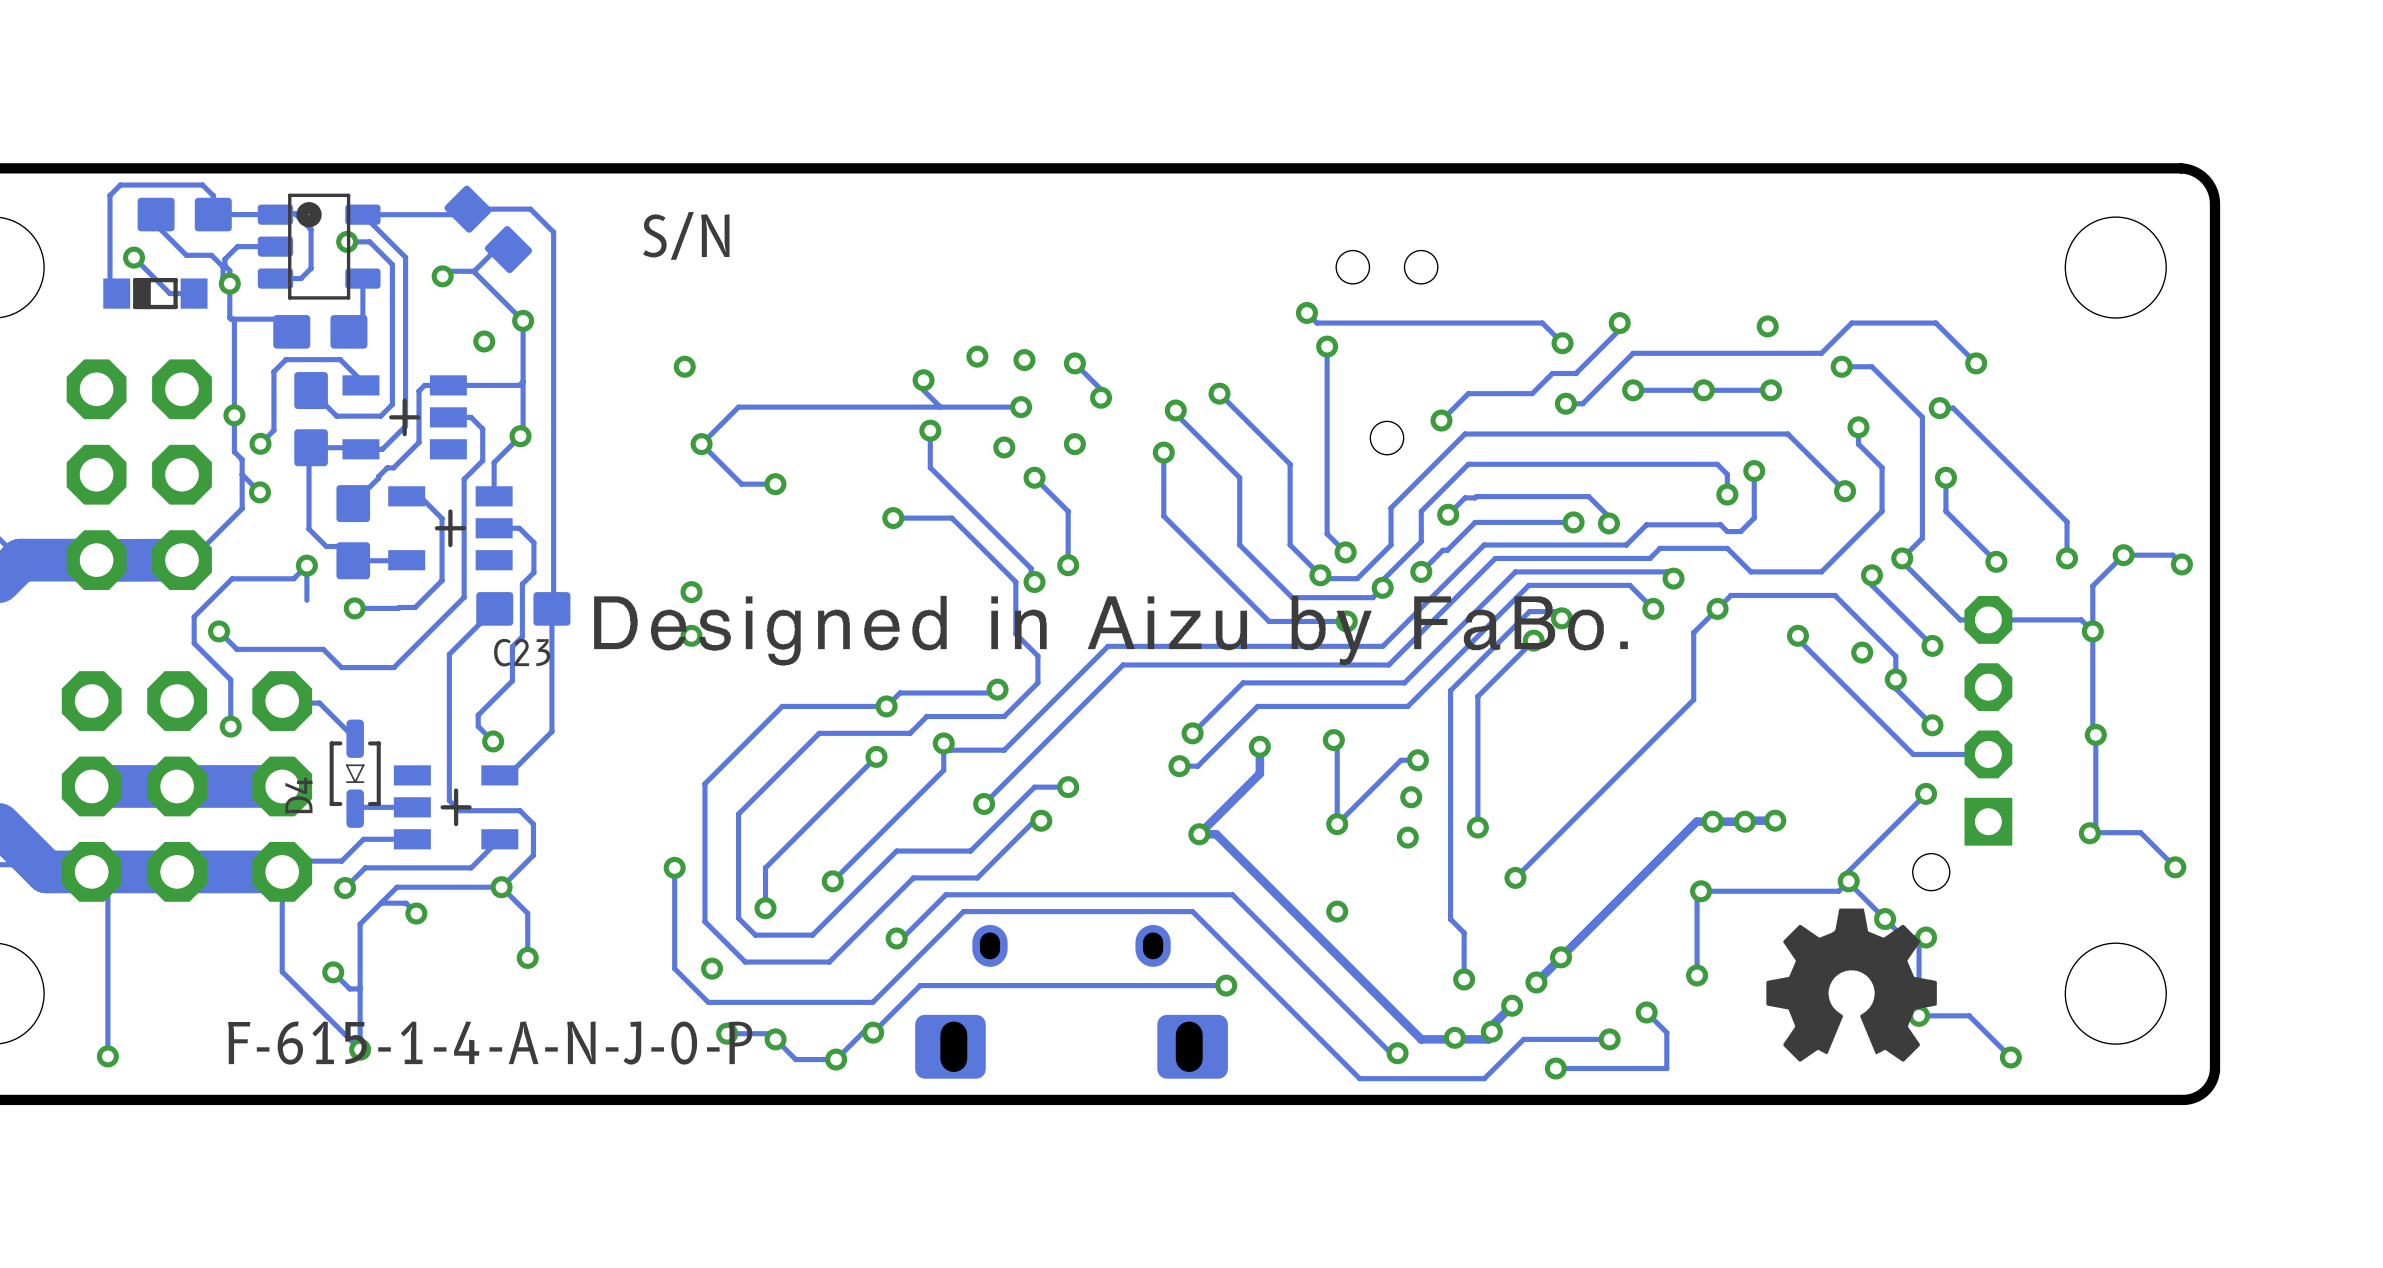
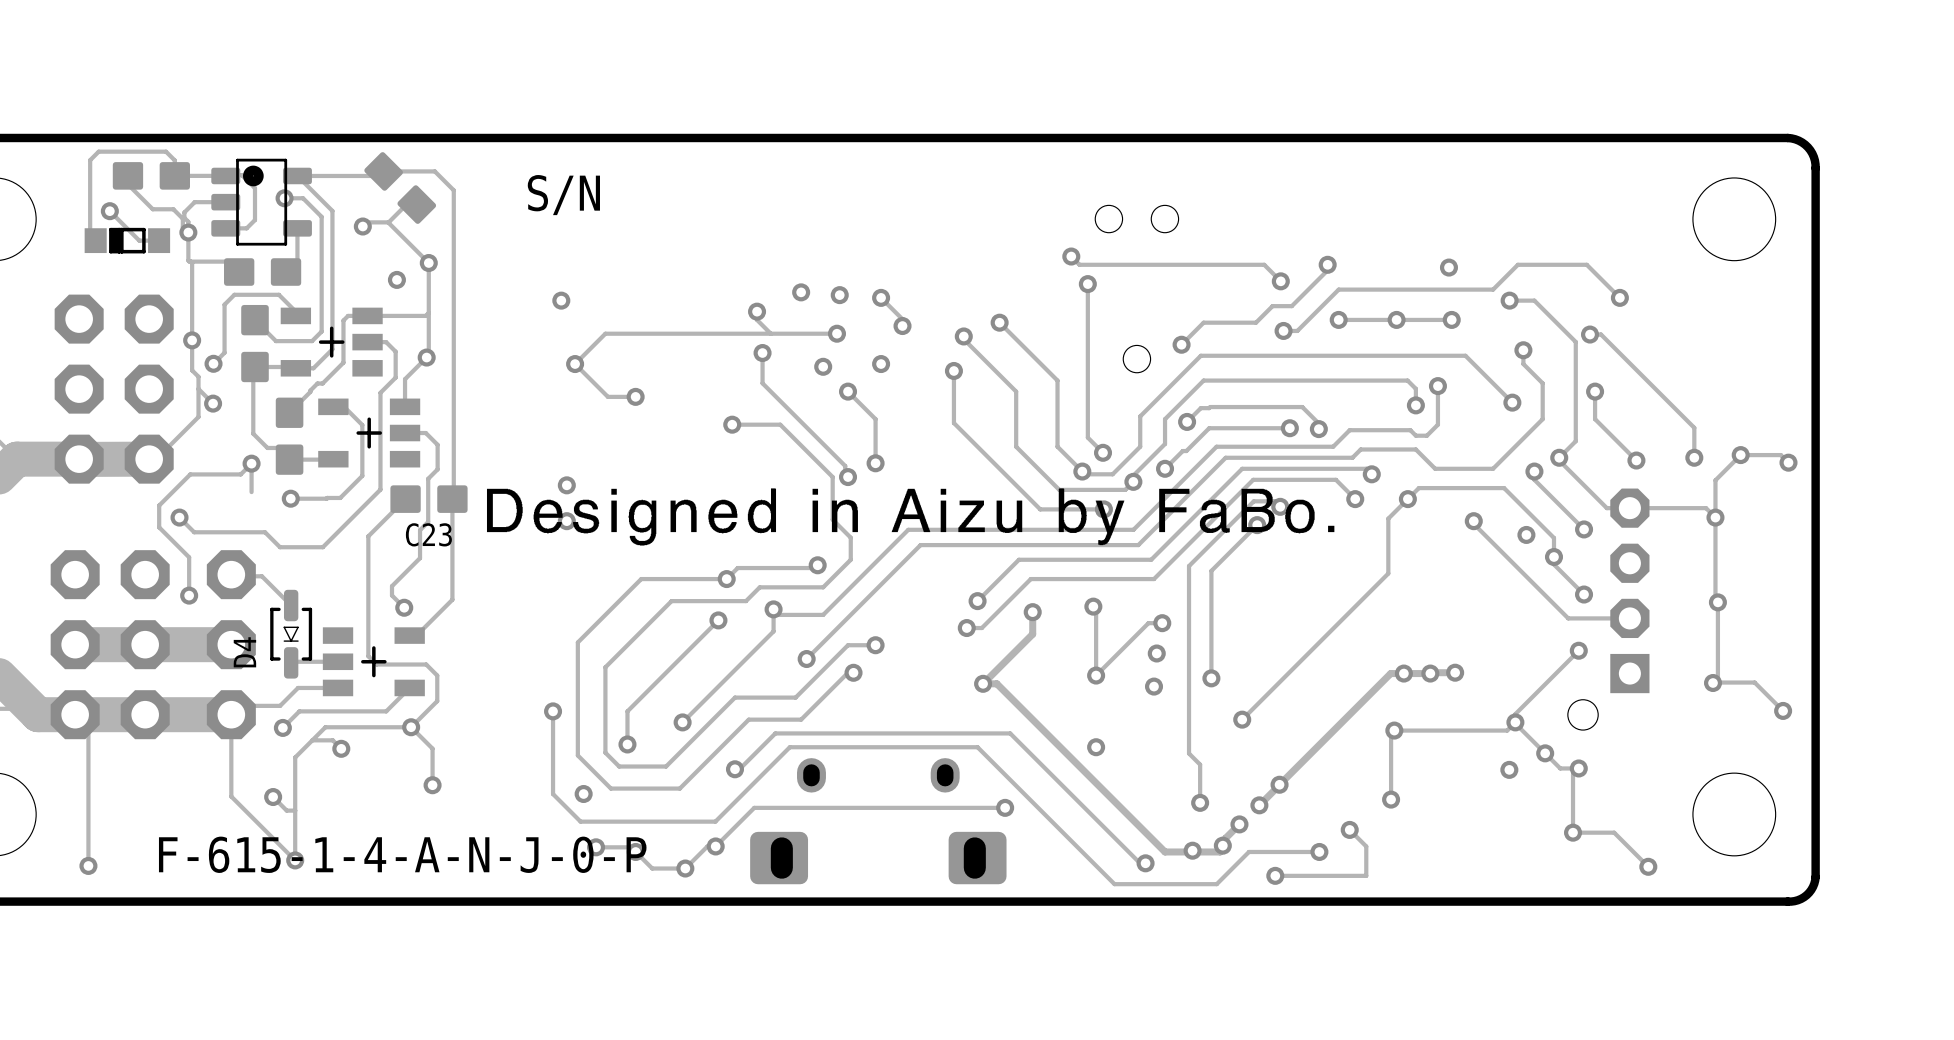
drawing: [1766, 908, 1937, 1062] -> none

